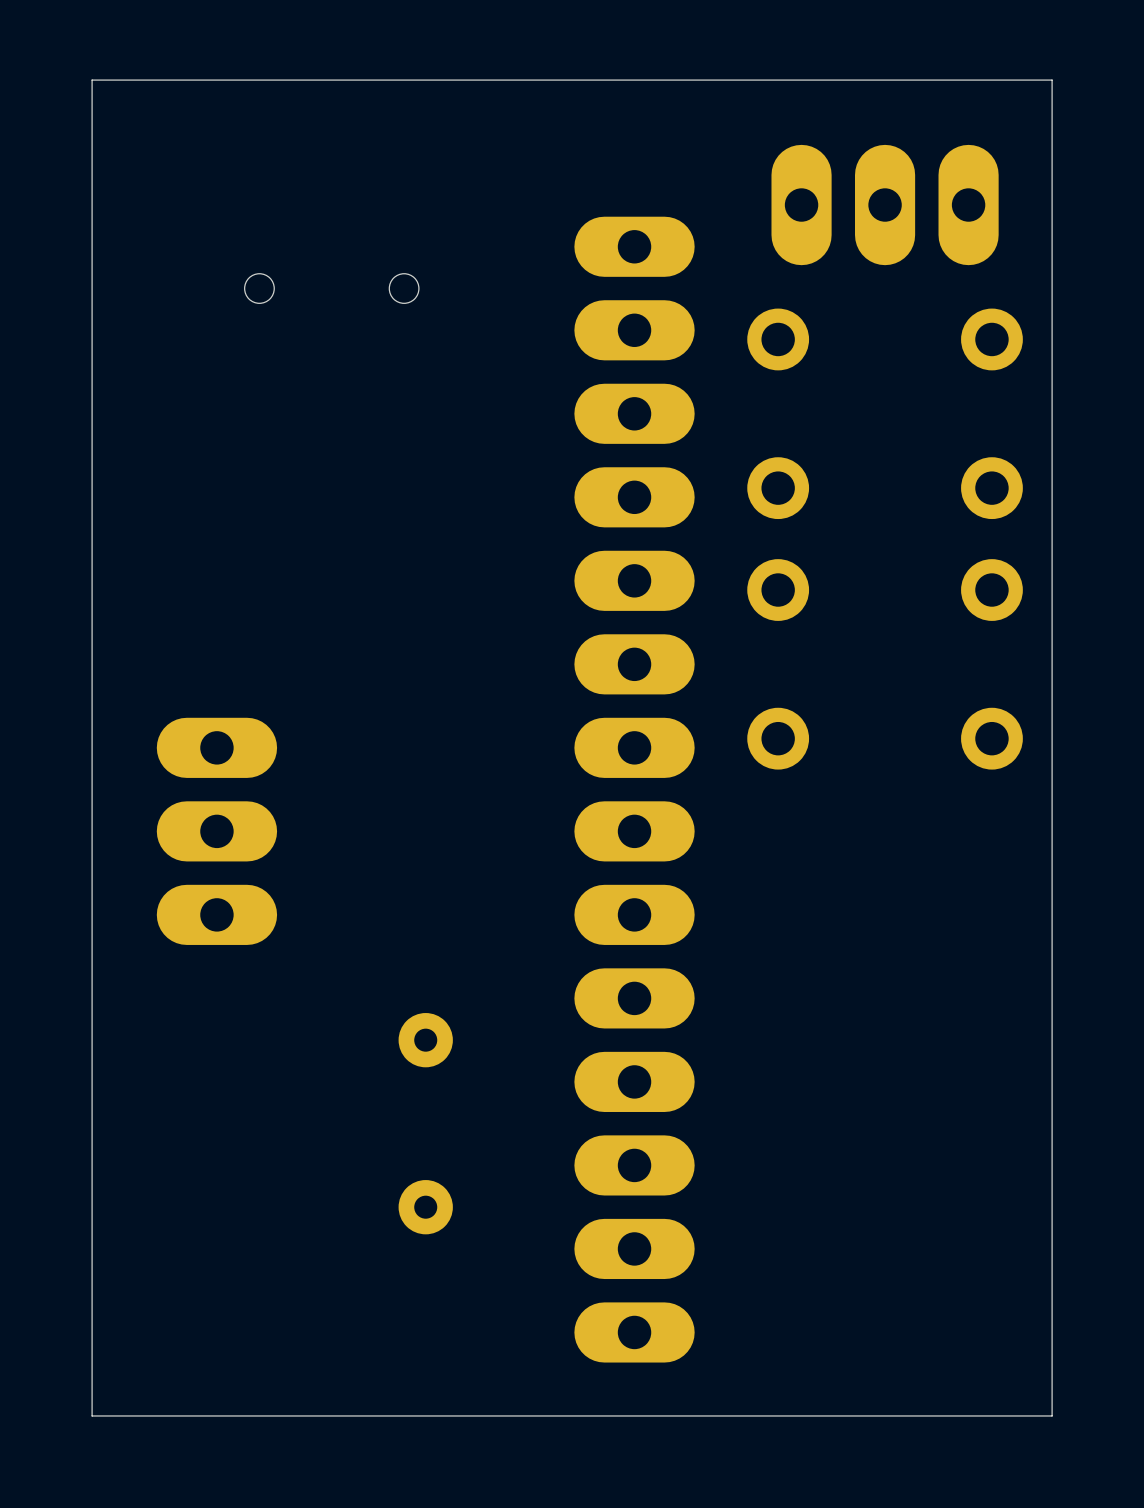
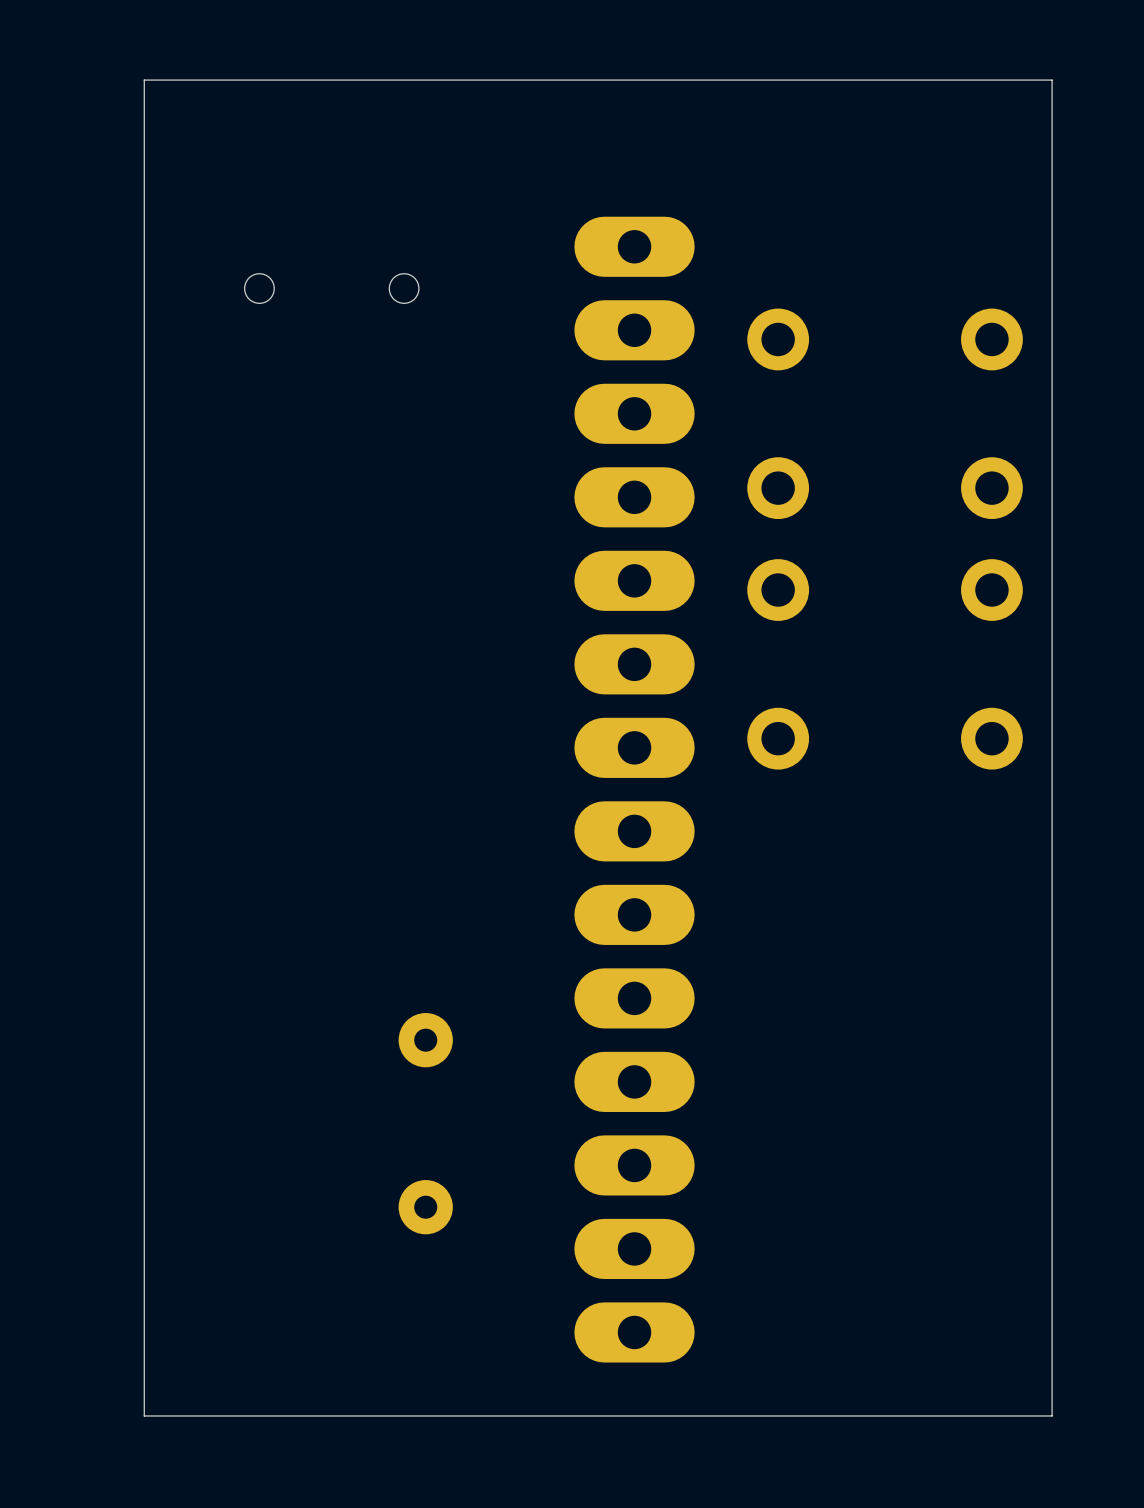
board edge: (144, 80) (92, 80) (92, 1415) (144, 1415) -> (144, 80) (144, 1415)
part: (885, 205) -> none
part: (216, 831) -> none

